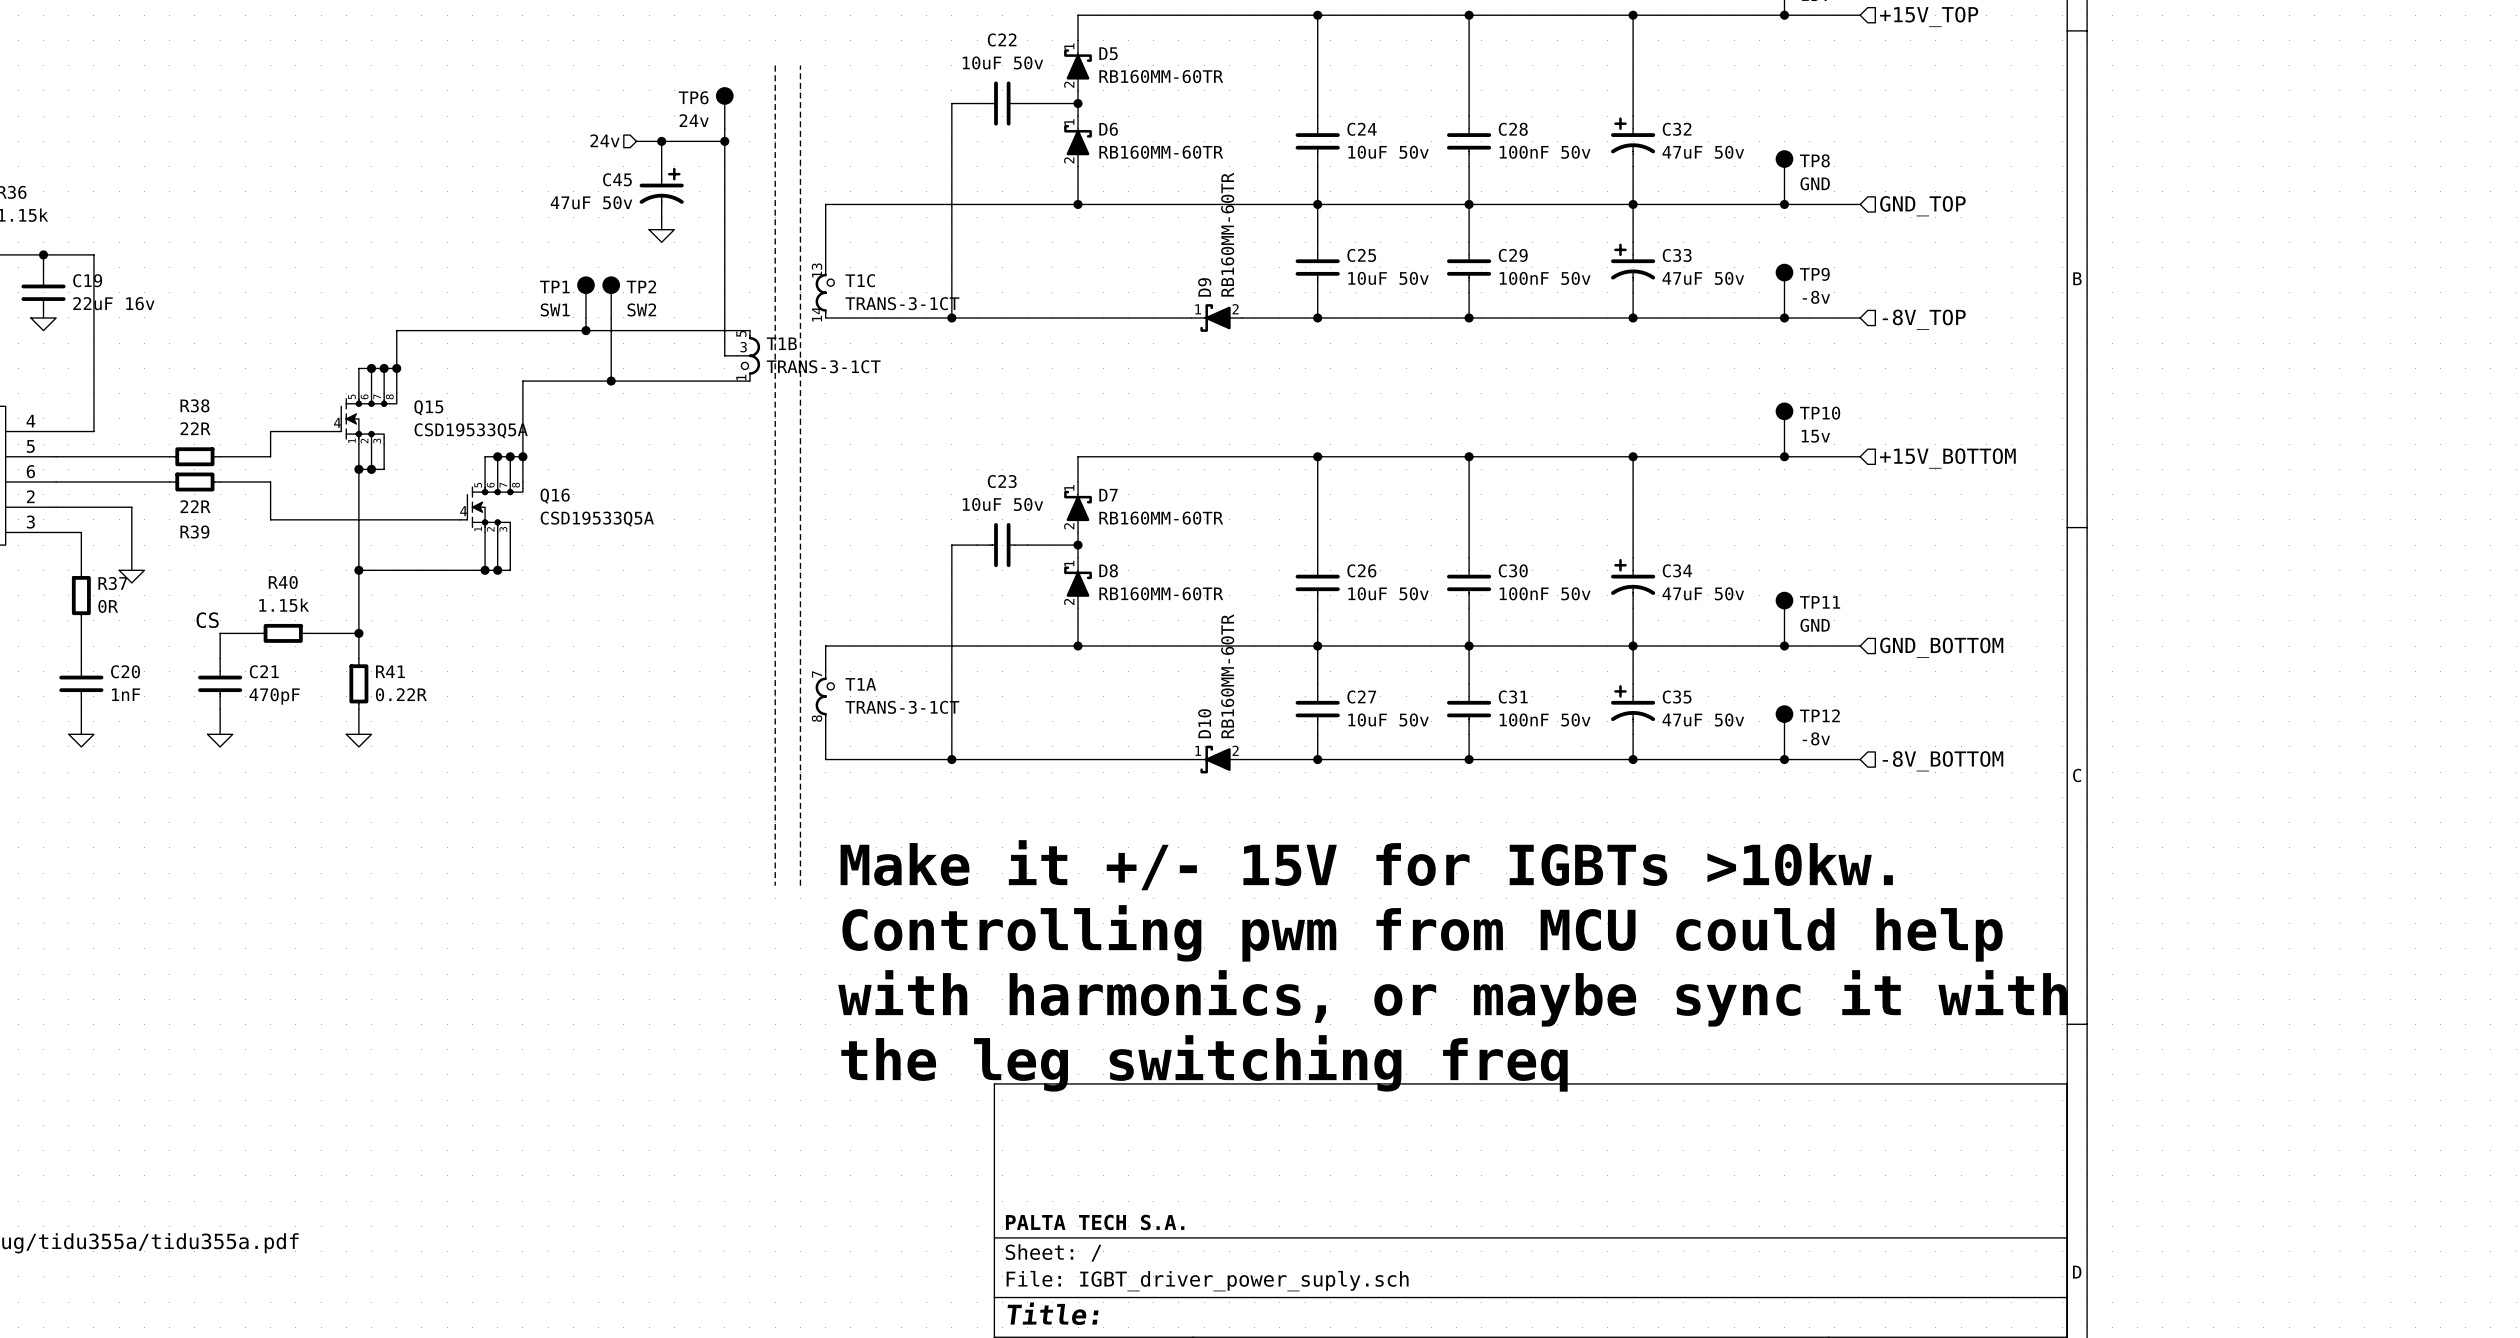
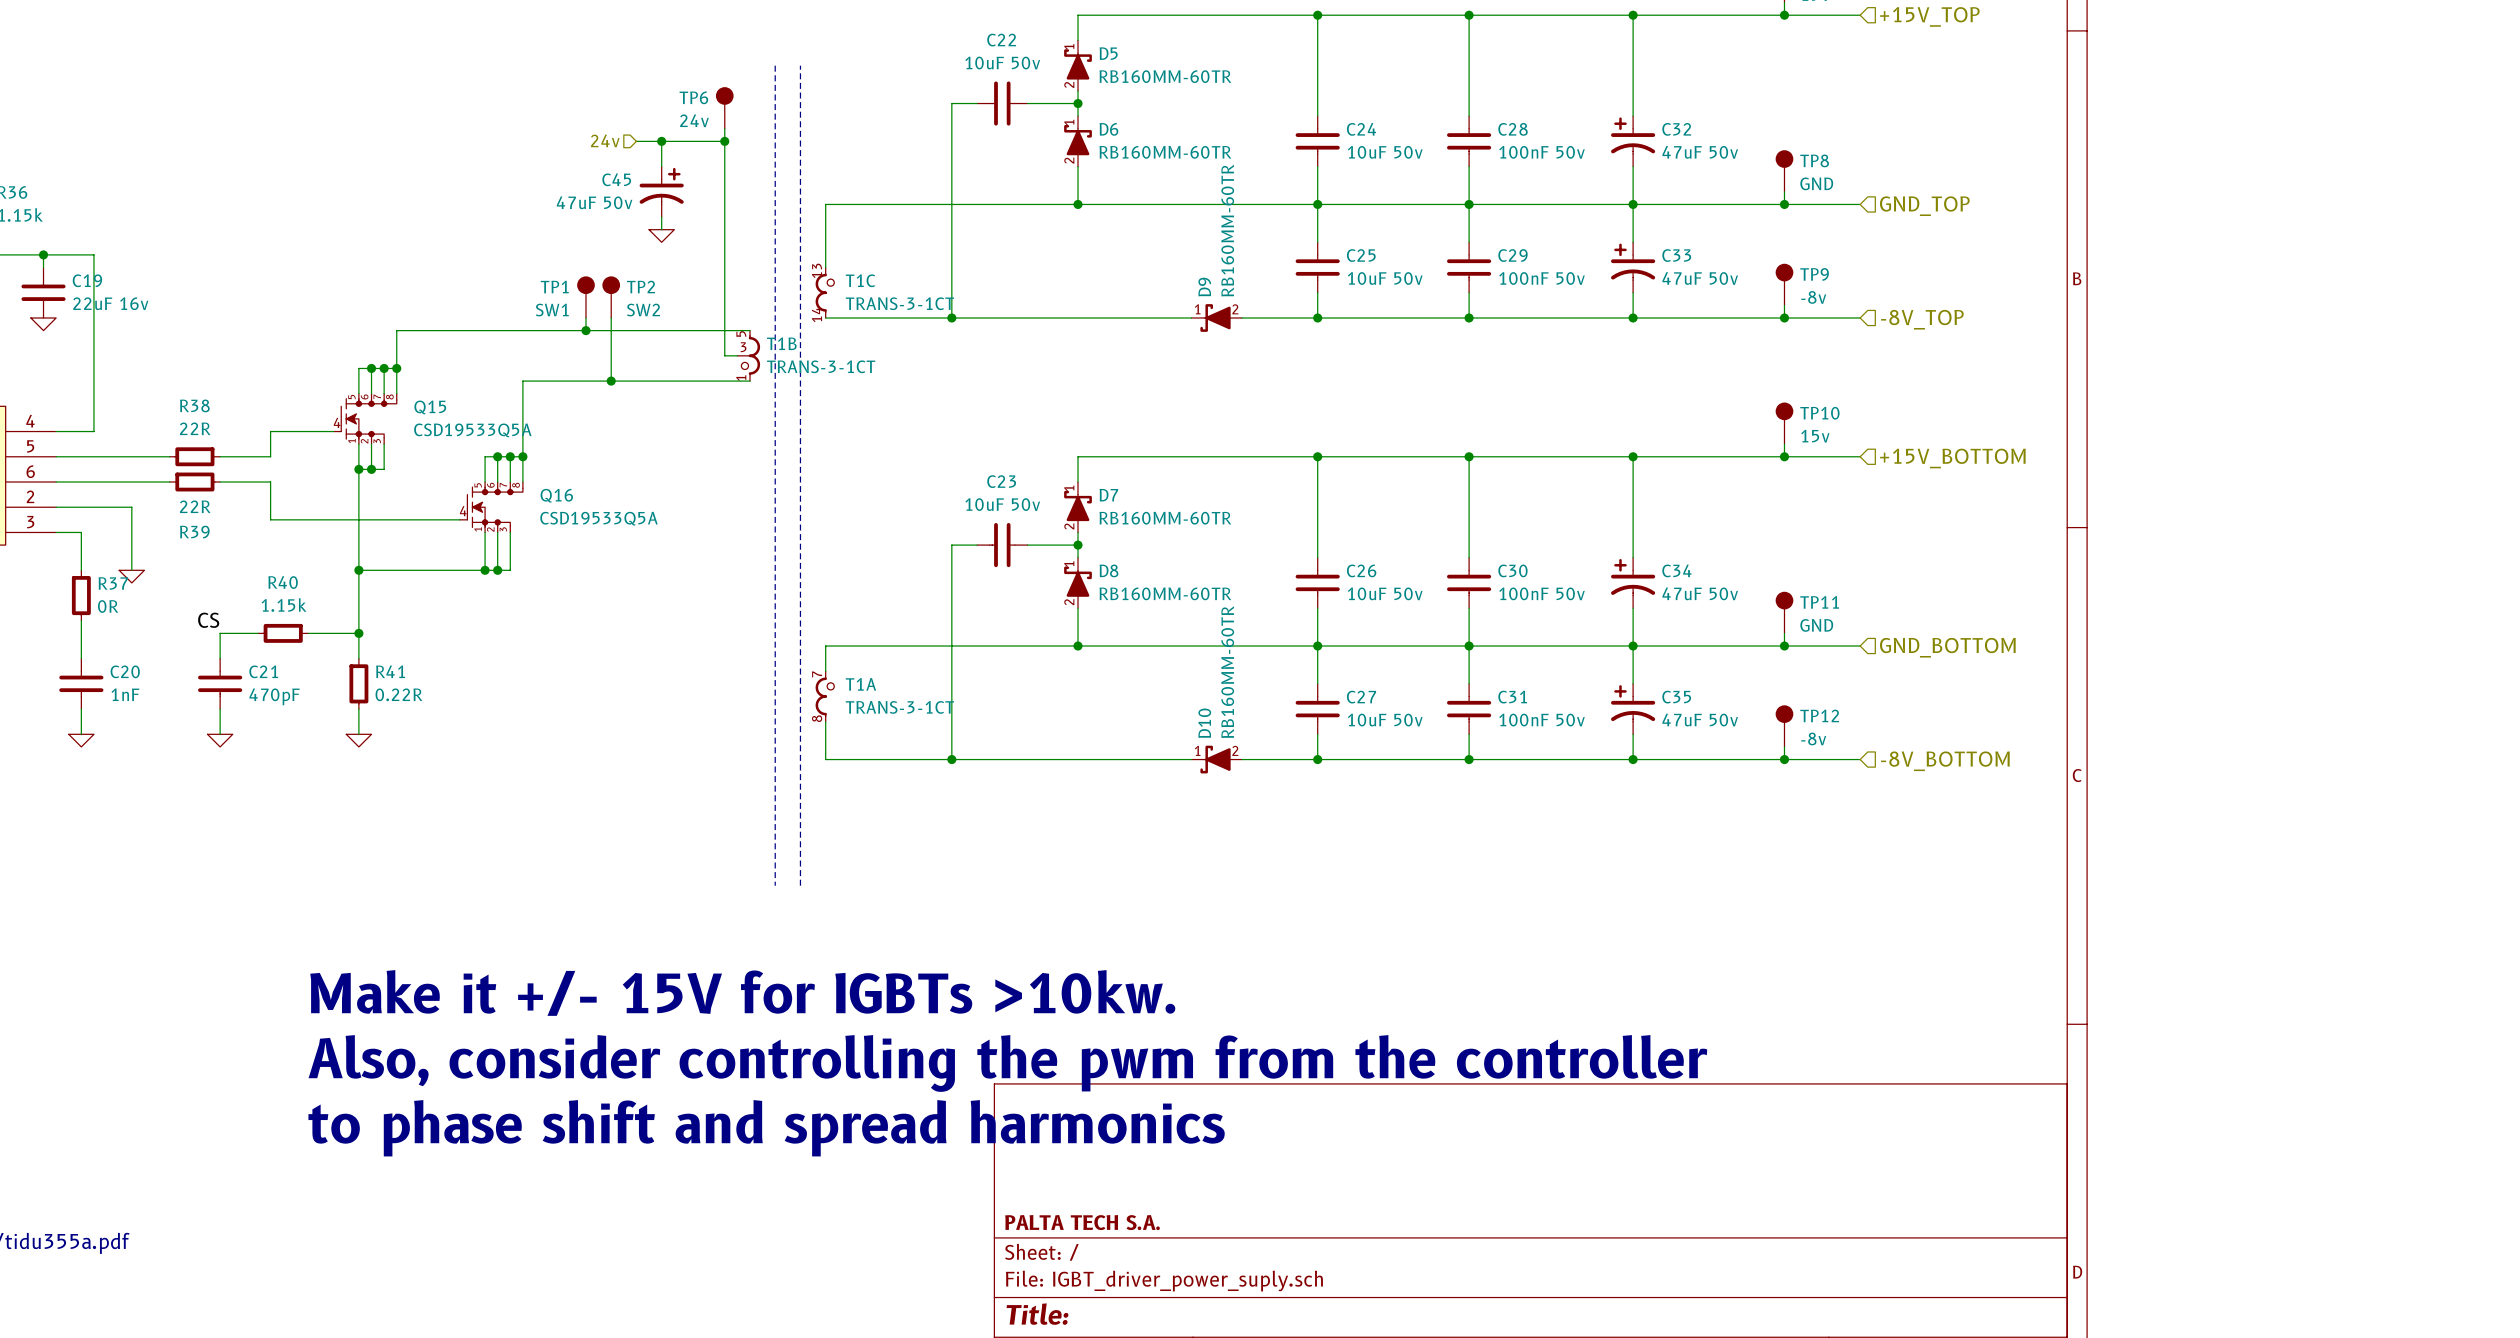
text: Make it +/- 15V for IGBTs >10kw. (1366, 865) -> none
text: Controlling pwm from MCU could help (1422, 933) -> none
text: none -> Make it +/- 15V for IGBTs >10kw. (742, 992)
text: with harmonics, or maybe sync it with (1452, 998) -> none
text: none -> Also, consider controlling the pwm from the controller (1007, 1063)
text: the leg switching freq (1204, 1063) -> none
text: none -> to phase shift and spread harmonics (766, 1128)

